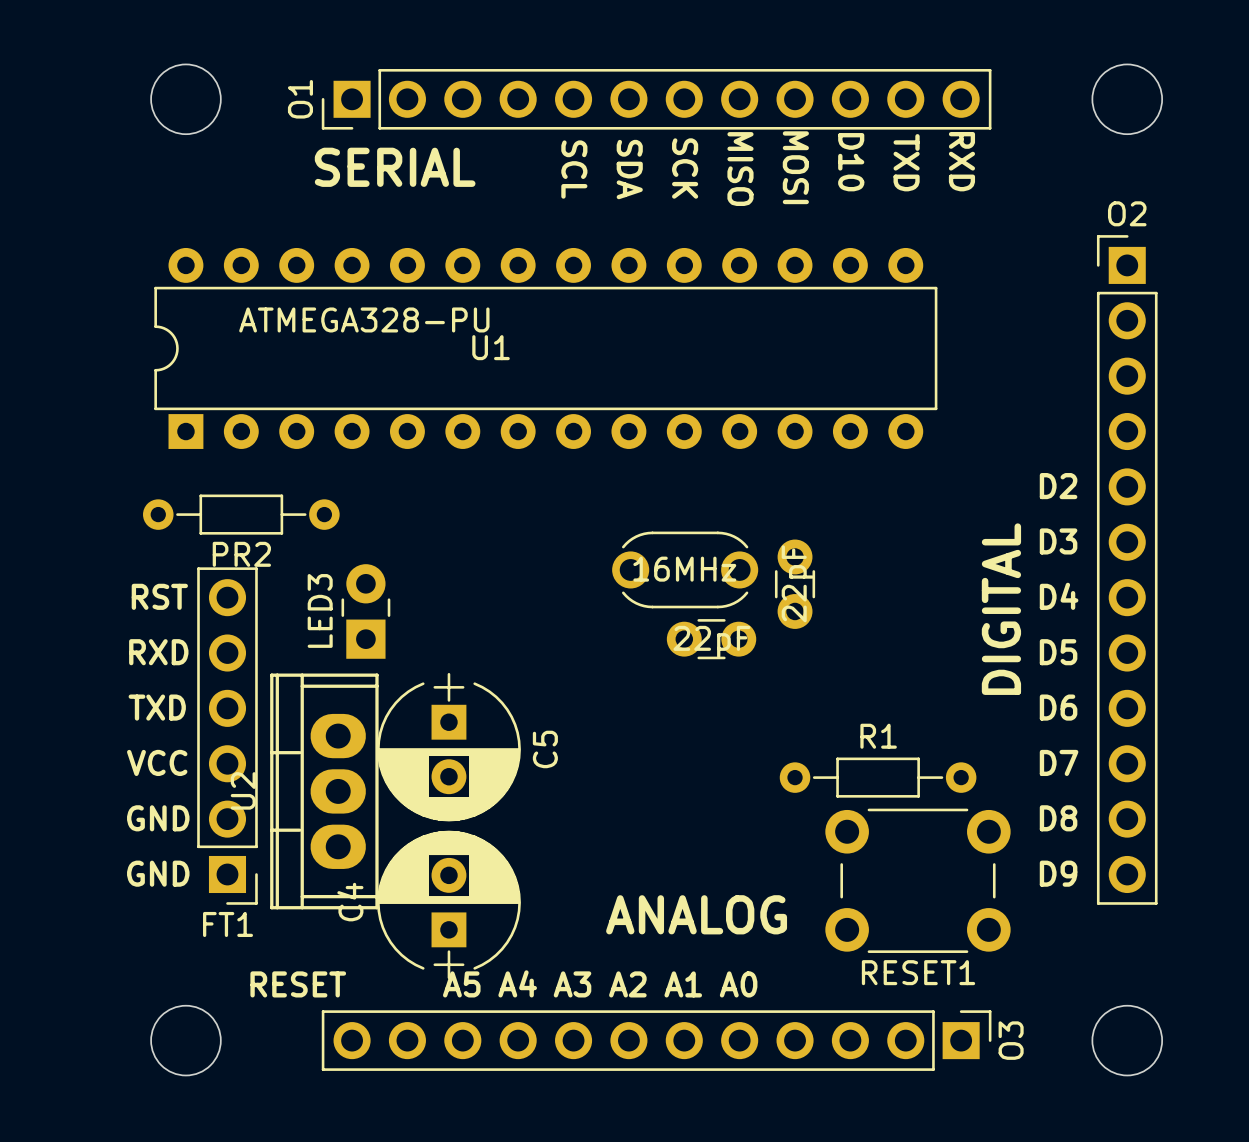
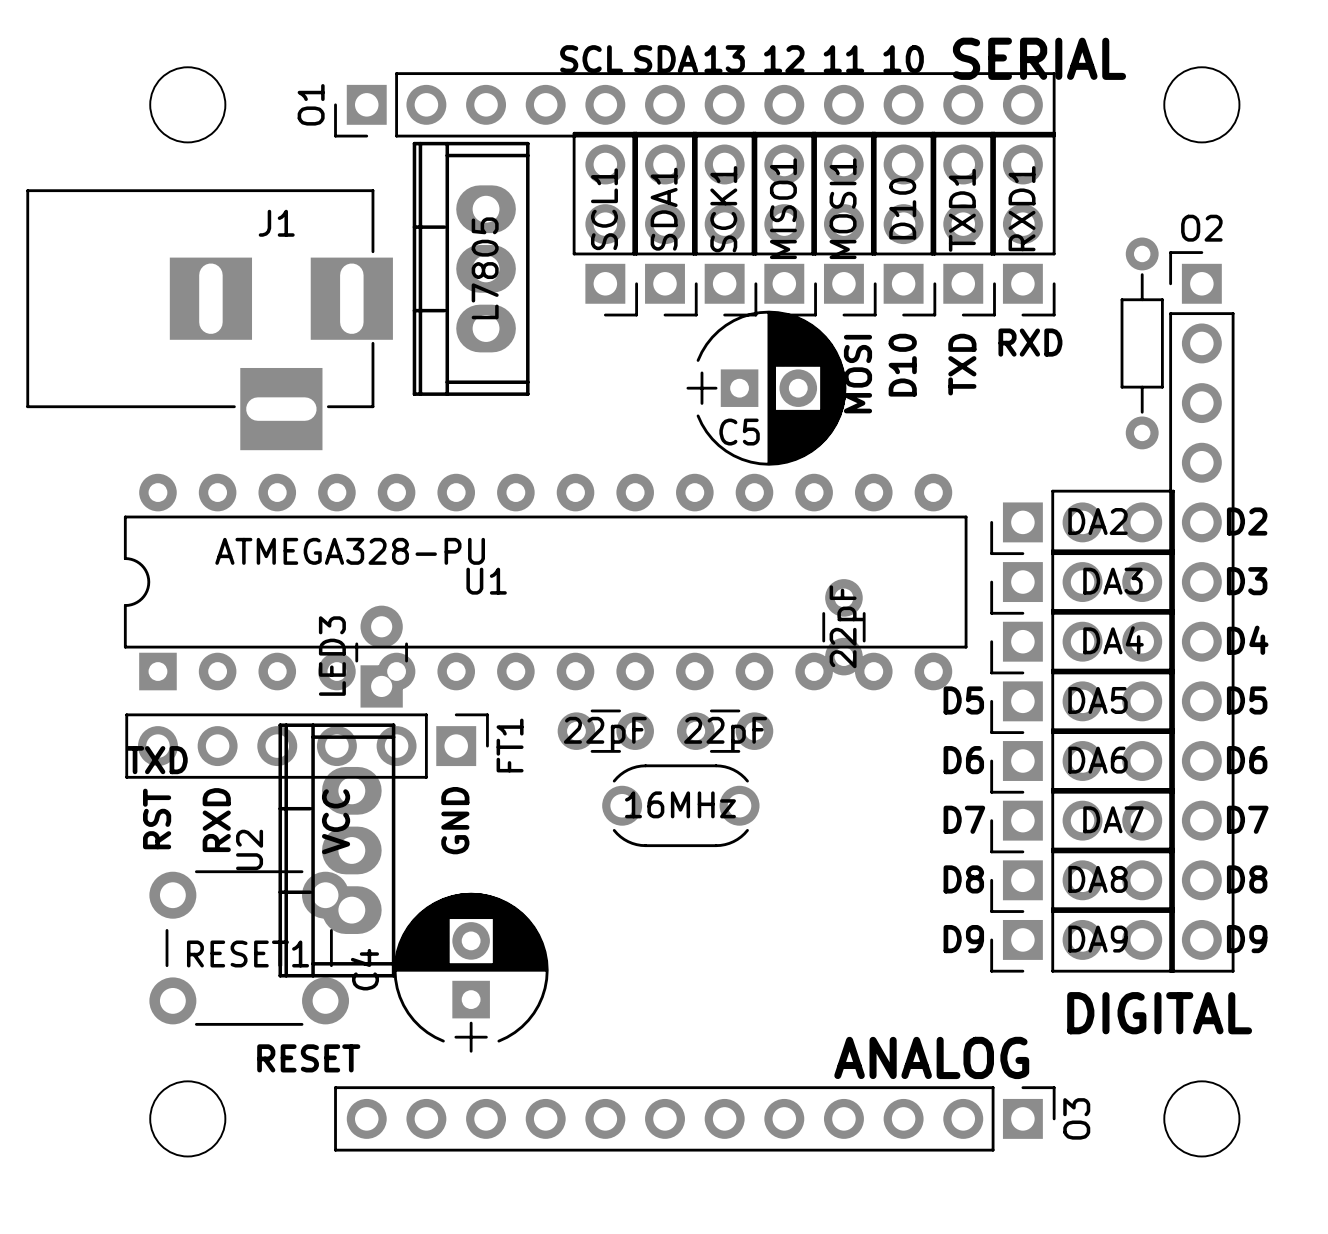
text: none -> 13 (724, 59)
text: none -> 12 (784, 59)
text: none -> 11 (843, 59)
text: none -> 10 (903, 59)
text: none -> SERIAL (1039, 58)
text rotation: 0° (961, 161) -> 90° counterclockwise (1030, 342)
text position: RXD (961, 161) -> RXD (1030, 342)
text rotation: 0° (851, 162) -> 180° (902, 365)
text position: D10 (851, 162) -> D10 (902, 365)
text rotation: 0° (906, 162) -> 180° (962, 364)
text position: TXD (906, 162) -> TXD (962, 364)
text: SERIAL (395, 167) -> none
text rotation: 0° (795, 167) -> 180° (857, 374)
text position: MOSI (795, 167) -> MOSI (857, 374)
text: SCK (685, 168) -> none
text rotation: 0° (574, 169) -> 90° counterclockwise (591, 59)
text position: SCL (574, 169) -> SCL (591, 59)
text rotation: 0° (629, 169) -> 90° counterclockwise (666, 59)
text position: SDA (629, 169) -> SDA (666, 59)
text: MISO (740, 169) -> none
SCL1: none -> (605, 224)
SDA1: none -> (665, 224)
SCK1: none -> (724, 224)
MISO1: none -> (784, 224)
MOSI1: none -> (843, 224)
D10: none -> (903, 224)
TXD1: none -> (963, 224)
RXD1: none -> (1022, 224)
part: none -> L7805 (471, 268)
J1: none -> (209, 319)
part: none -> (1142, 343)
U1 position: (545, 348) -> (545, 582)
DA2: none -> (1082, 522)
text position: D2 (1058, 486) -> D2 (1247, 521)
PR2: (241, 514) -> none
text position: D3 (1058, 541) -> D3 (1247, 581)
DA3: none -> (1082, 582)
part position: (685, 569) -> (680, 805)
text: RST (159, 596) -> none
text position: D4 (1059, 596) -> D4 (1247, 640)
DA4: none -> (1082, 641)
text rotation: 0° (1001, 609) -> 90° clockwise (1159, 1013)
text position: DIGITAL (1001, 609) -> DIGITAL (1159, 1013)
part position: (711, 639) -> (725, 731)
text rotation: 0° (158, 652) -> 90° counterclockwise (216, 820)
text position: RXD (158, 652) -> RXD (216, 820)
text: none -> D5 (963, 700)
text: D5 (1058, 652) -> none
text: none -> D5 (1247, 700)
DA5: none -> (1082, 701)
part: none -> 22pF (605, 731)
text: none -> D6 (963, 760)
text: D6 (1058, 707) -> none
text: none -> D6 (1247, 760)
DA6: none -> (1082, 761)
FT1 rotation: 0° (227, 736) -> 90° counterclockwise (307, 746)
C5 rotation: 0° (448, 747) -> 90° counterclockwise (766, 388)
C5 position: (448, 747) -> (766, 388)
C5 name position: C5 (545, 749) -> C5 (739, 432)
text: VCC (157, 762) -> RST (157, 818)
text: none -> D7 (964, 819)
text: D7 (1059, 762) -> none
text: none -> D7 (1247, 819)
text: none -> GND (455, 820)
DA7: none -> (1082, 820)
text: none -> VCC (336, 821)
R1: (878, 777) -> none
text: GND (158, 818) -> none
text: none -> D8 (963, 879)
text: D8 (1058, 818) -> none
text: none -> D8 (1247, 879)
DA8: none -> (1082, 880)
text: GND (158, 873) -> none
text: none -> D9 (963, 939)
text: D9 (1058, 873) -> none
text: none -> D9 (1247, 939)
DA9: none -> (1082, 939)
RESET1 position: (917, 880) -> (249, 948)
text position: ANALOG (696, 914) -> ANALOG (931, 1057)
RESET1 name position: RESET1 (918, 972) -> RESET1 (248, 953)
text: A4 (517, 983) -> none
text: A5 (461, 984) -> none
text: A3 (572, 984) -> none
text: A2 (627, 984) -> none
text: A1 (683, 984) -> none
text: A0 (738, 984) -> none

